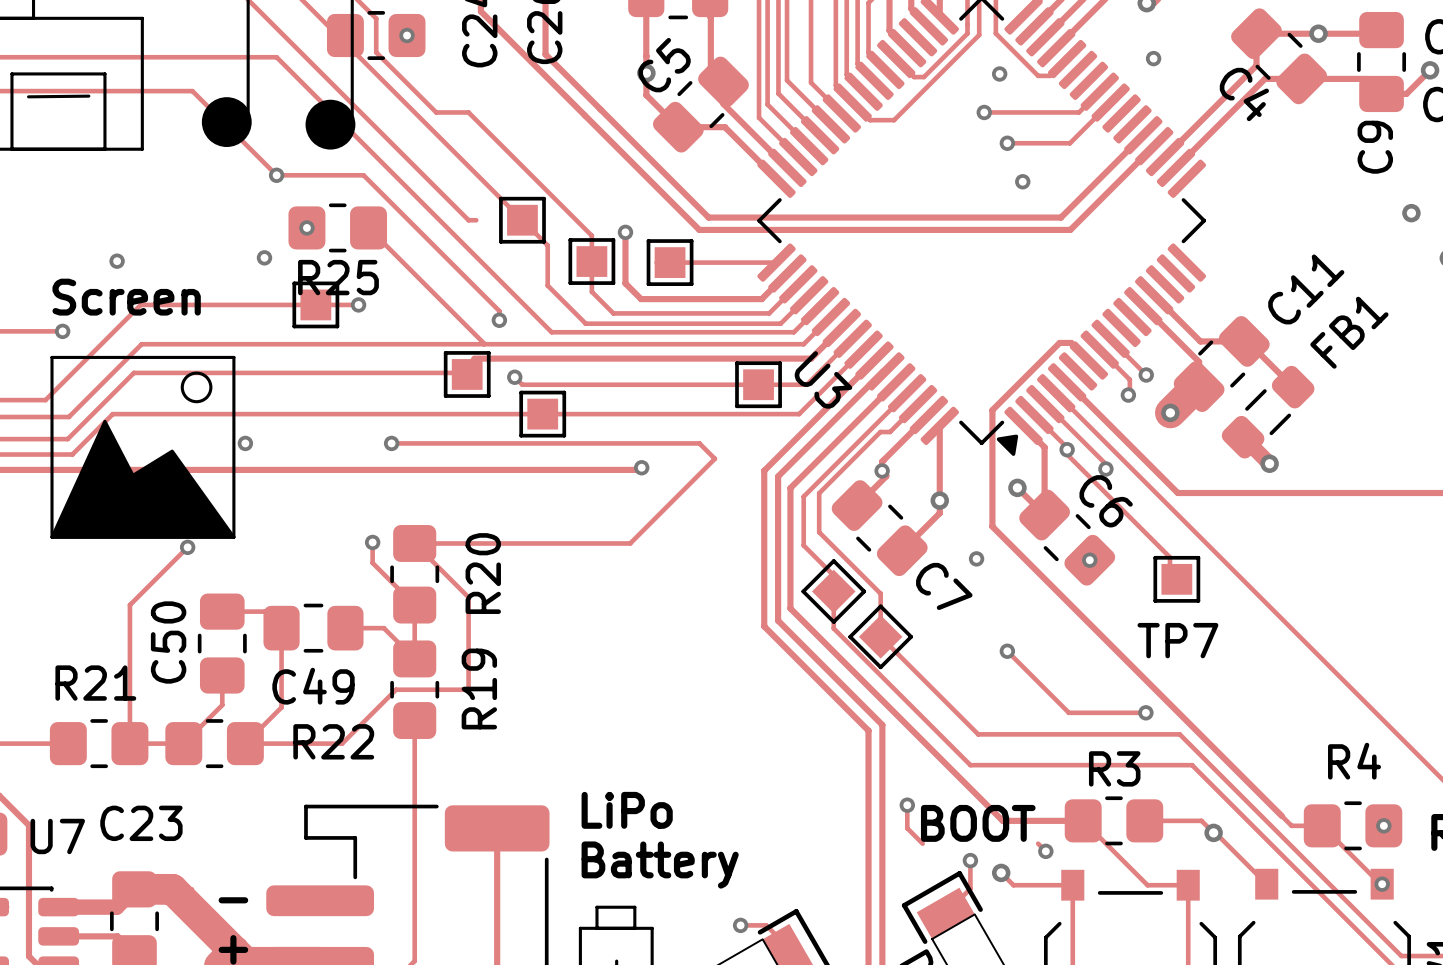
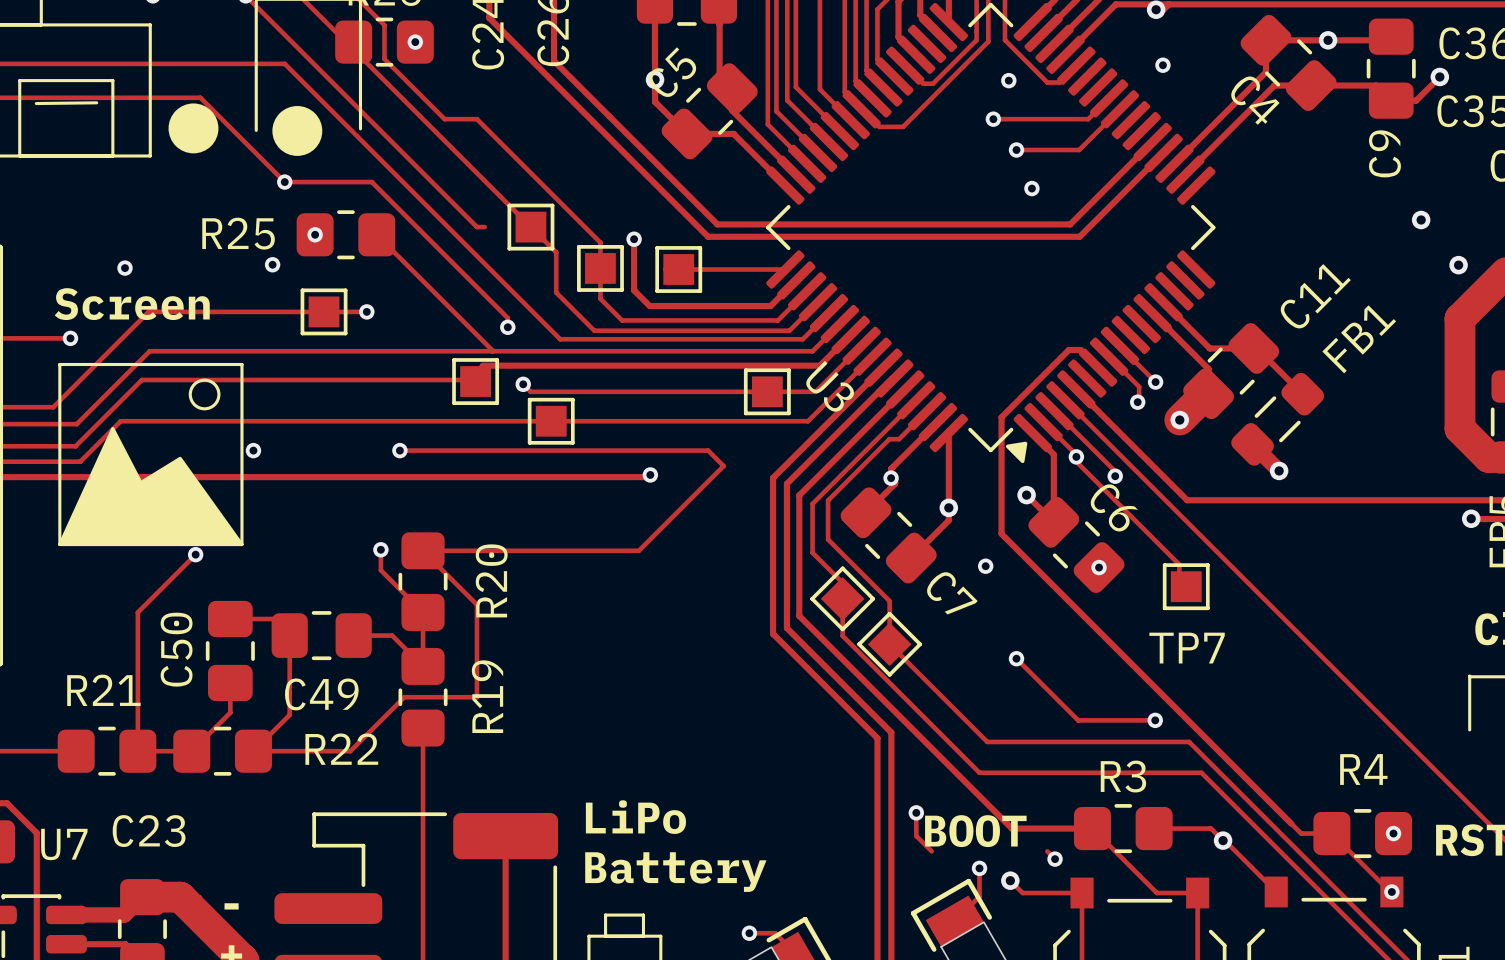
drawing: none -> [168, 103, 219, 154]
drawing: [201, 97, 252, 147] -> none
drawing: none -> [272, 106, 323, 156]
drawing: [305, 99, 356, 150] -> none
R25 name position: R25 (338, 277) -> R25 (238, 233)

